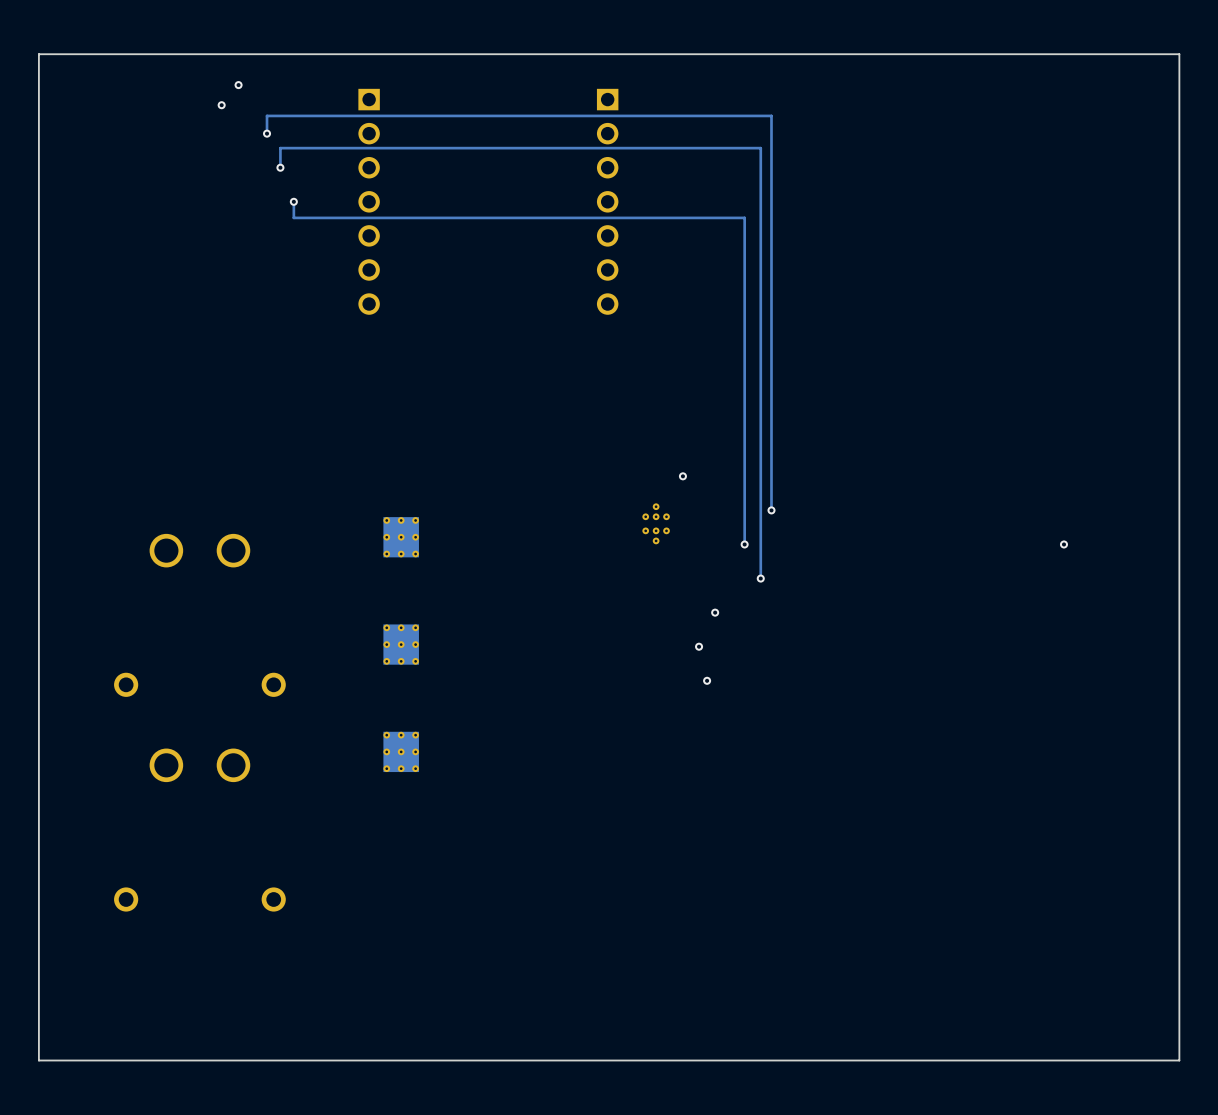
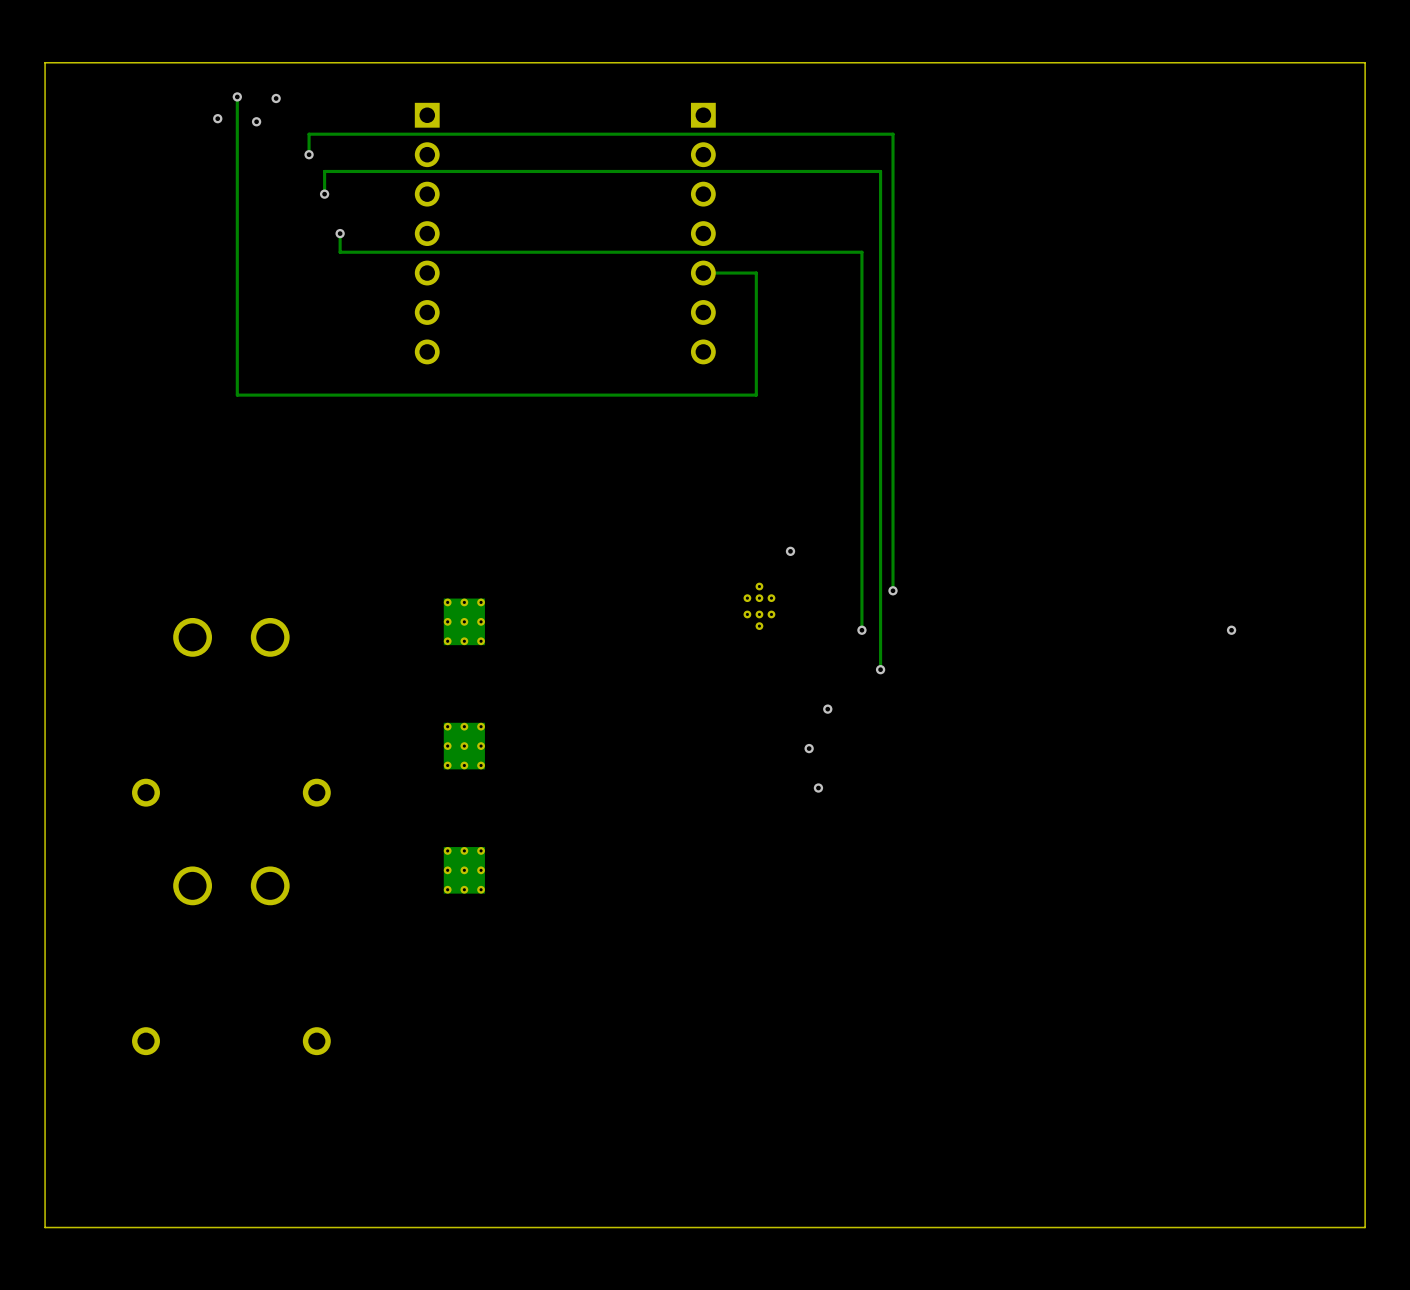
track: none -> (237, 96) (237, 395) (756, 395) (756, 273) (703, 273)
via: none -> (237, 96)
via: none -> (217, 118)

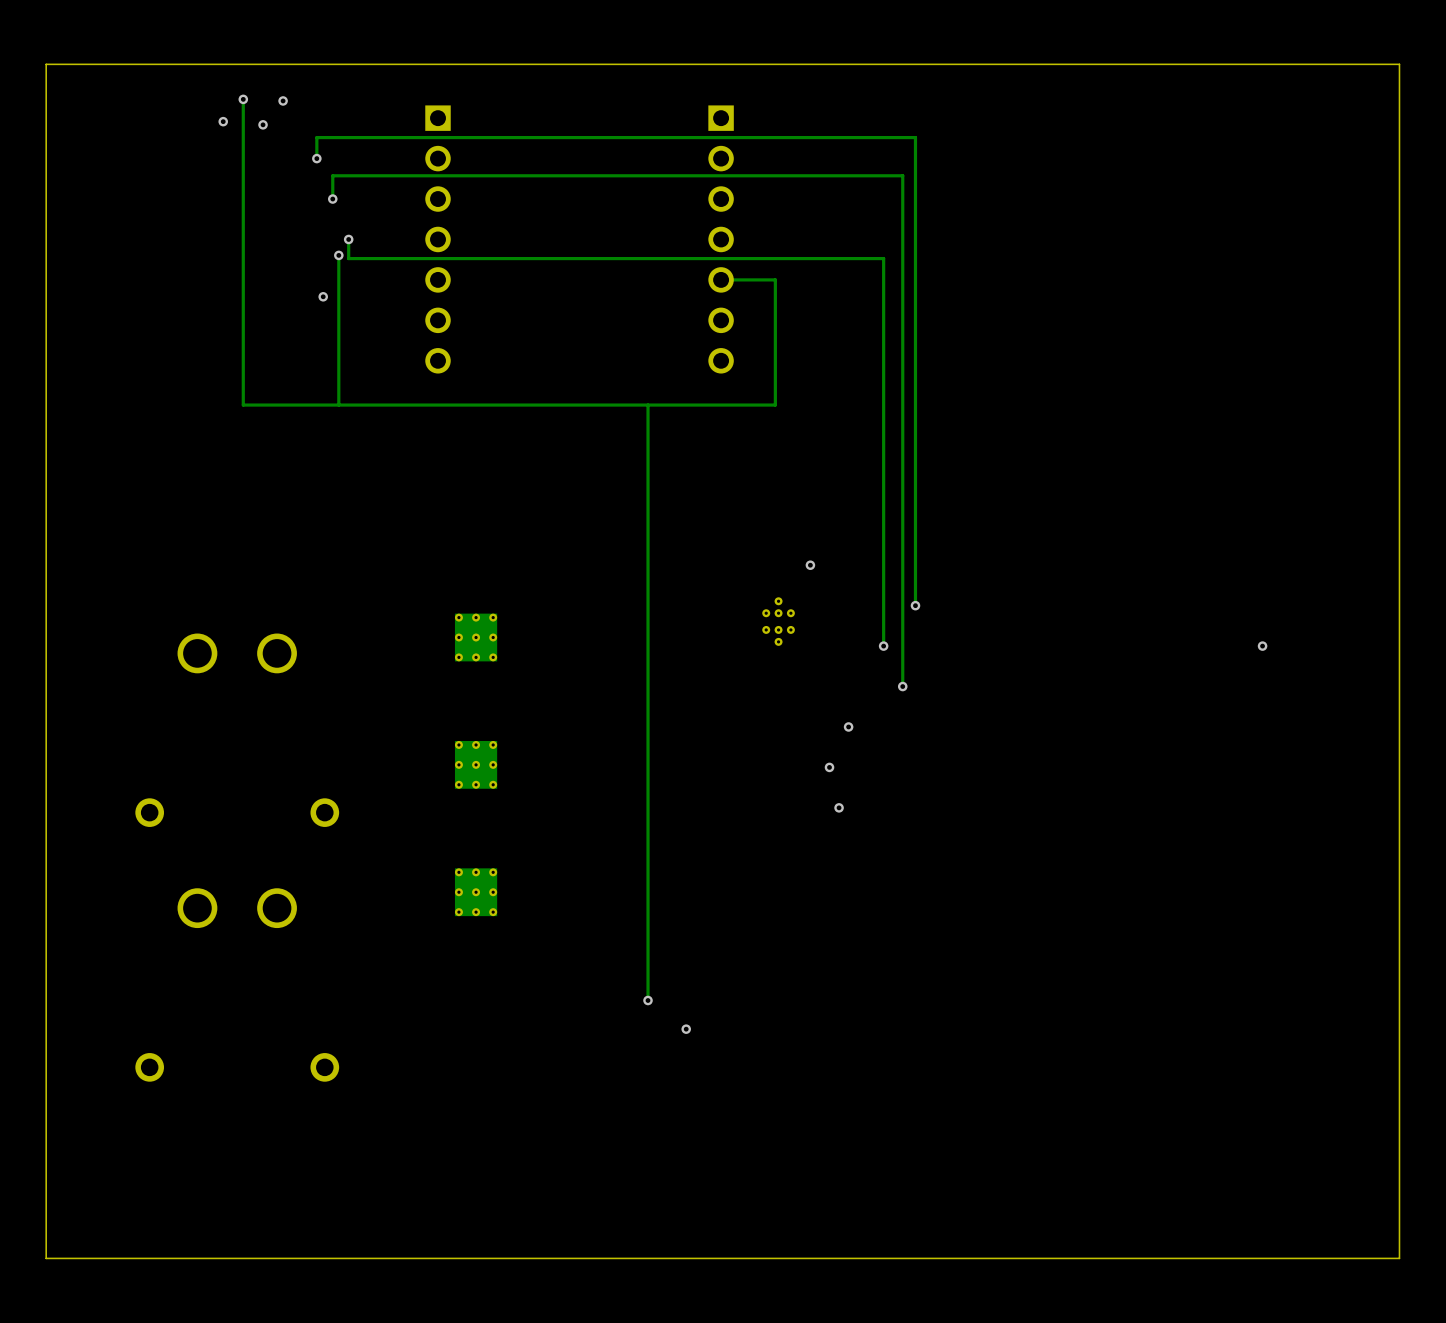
track: none -> (338, 255) (338, 405)
via: none -> (338, 255)
via: none -> (323, 296)
track: none -> (648, 405) (648, 1000)
via: none -> (648, 1000)
via: none -> (686, 1029)

